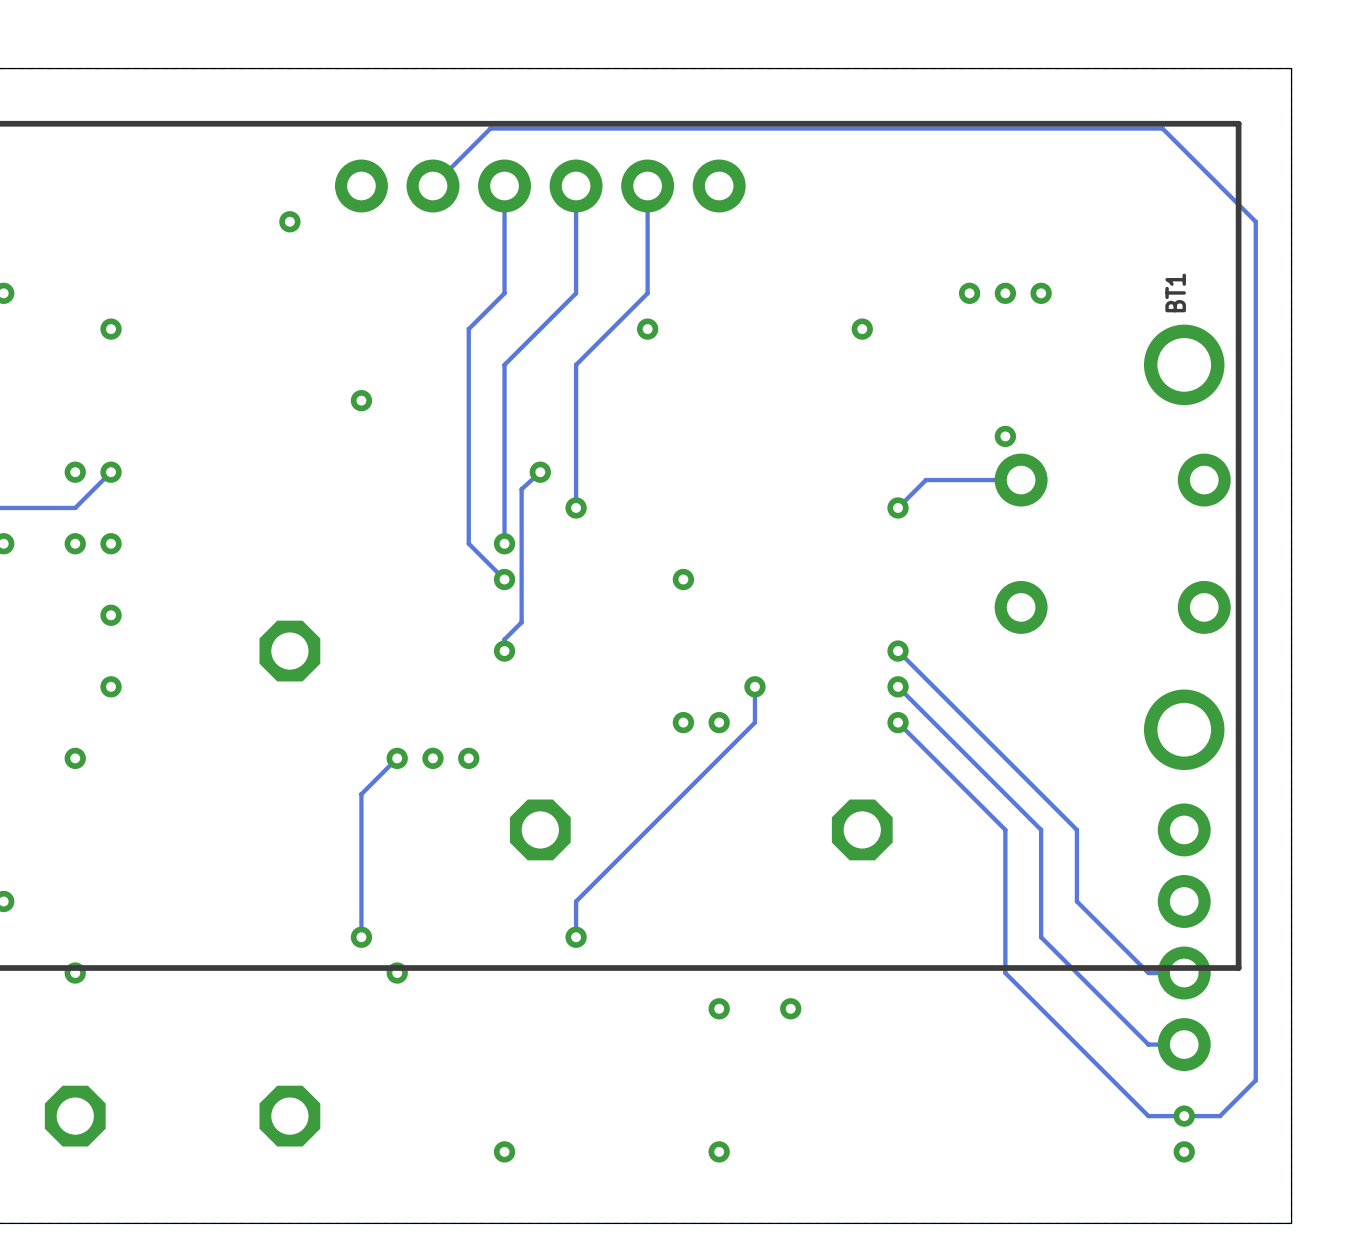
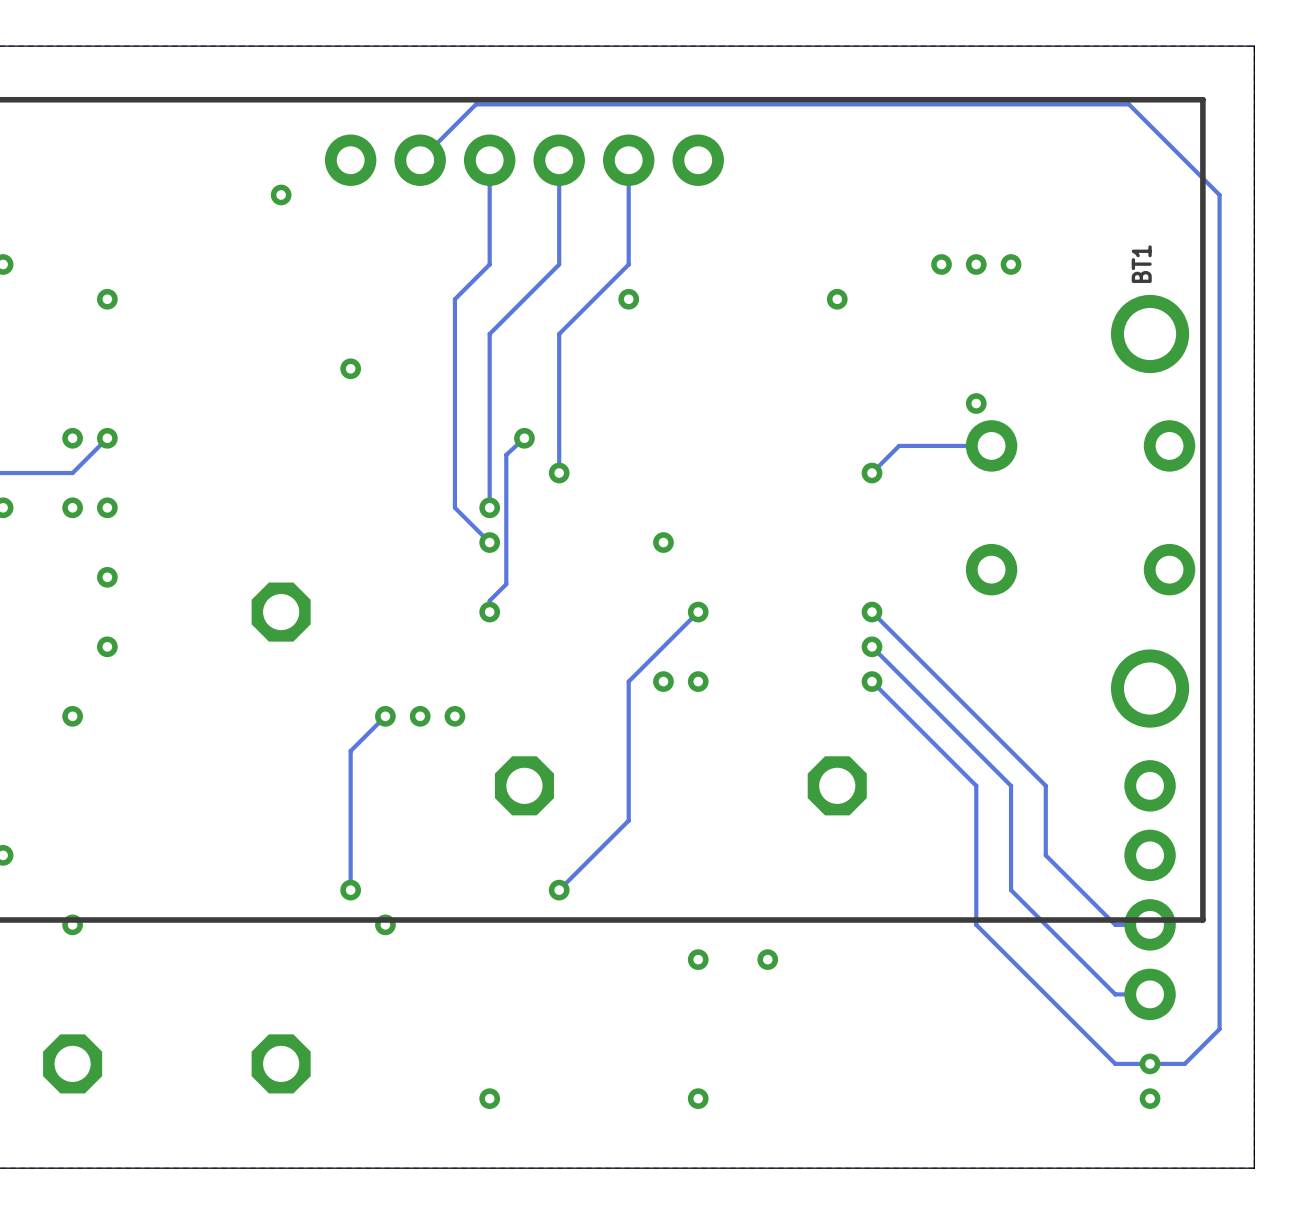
track: (754, 686) (754, 722) (576, 901) (576, 937) -> (698, 612) (628, 681) (628, 820) (559, 890)
via position: (754, 686) -> (698, 612)

